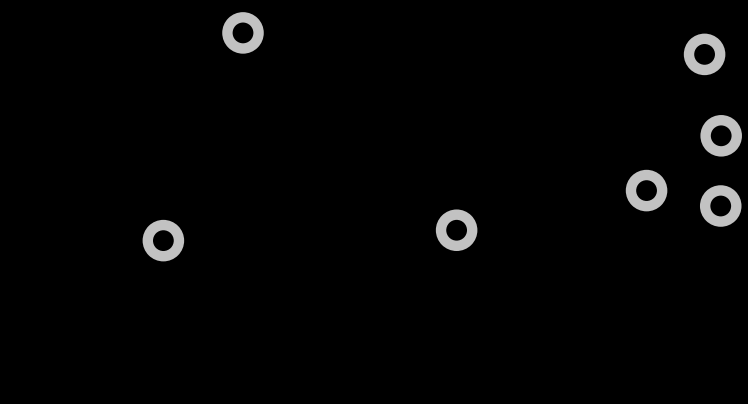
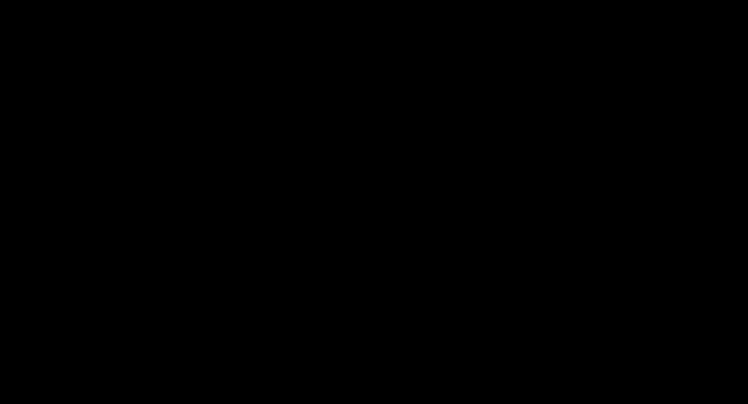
via: (243, 32) -> none
via: (704, 54) -> none
via: (721, 135) -> none
via: (646, 190) -> none
via: (720, 206) -> none
via: (456, 230) -> none
via: (163, 240) -> none

